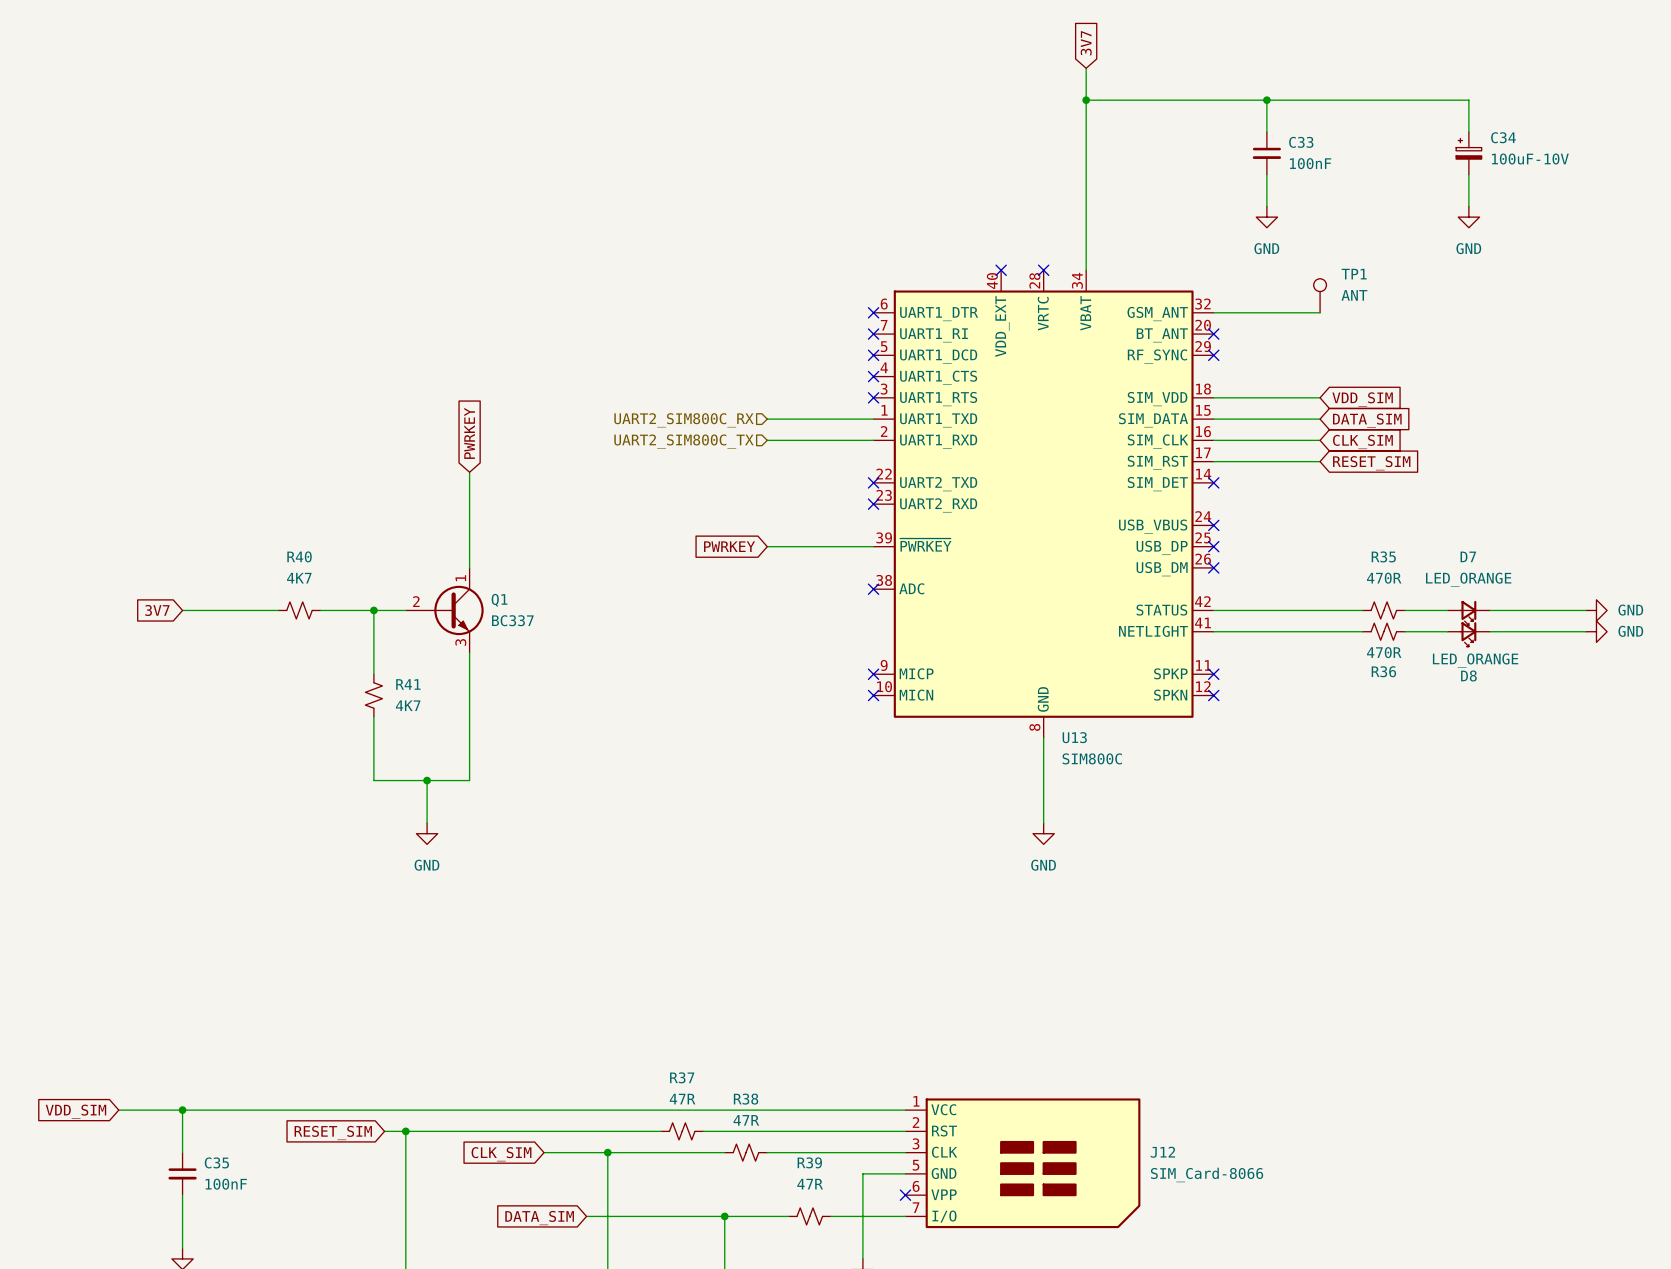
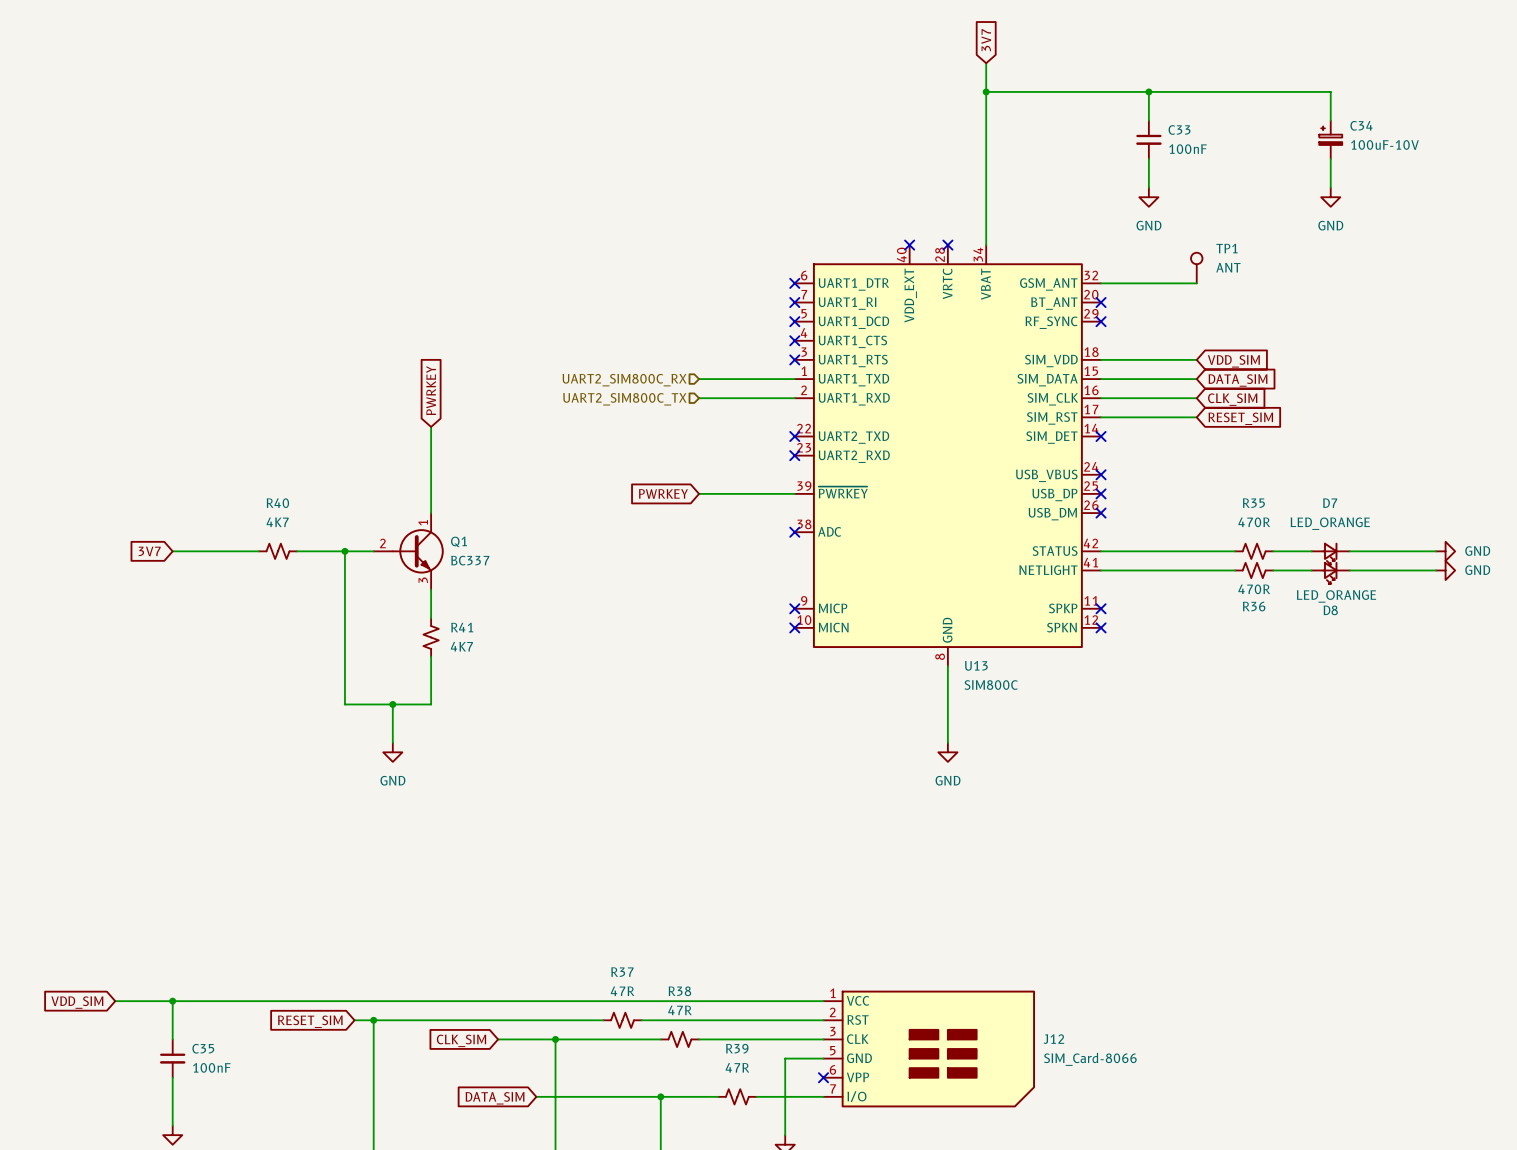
R41 position: (373, 695) -> (431, 637)

